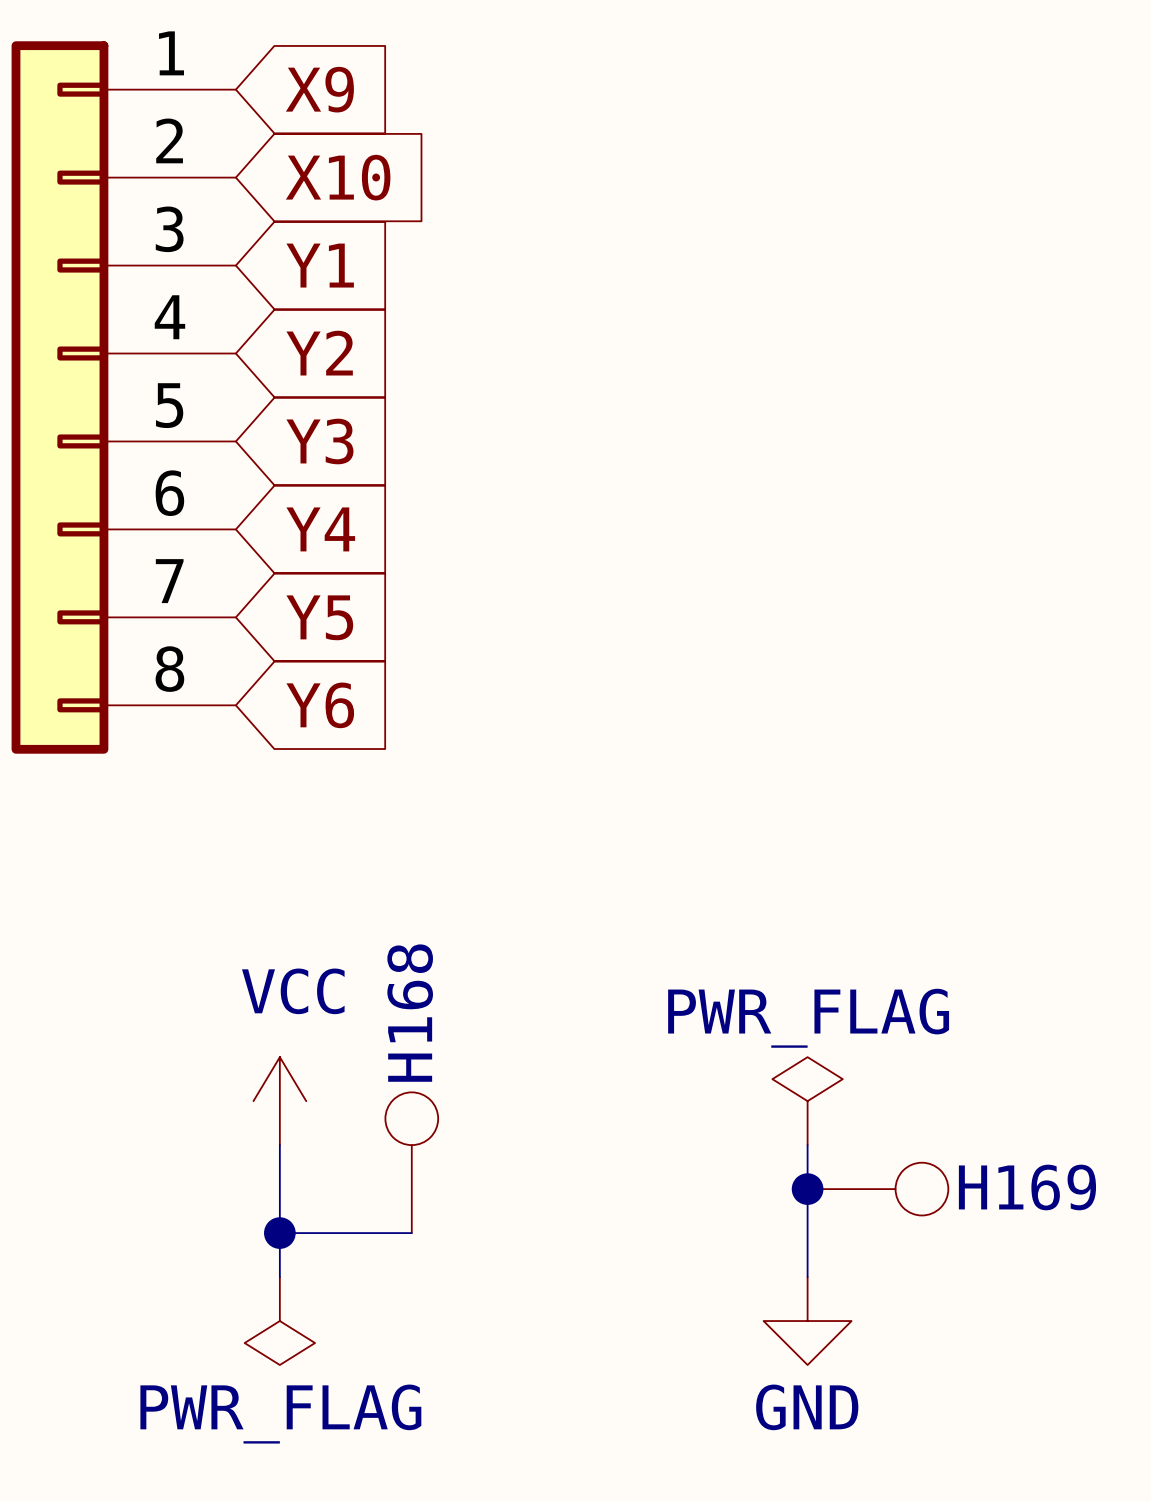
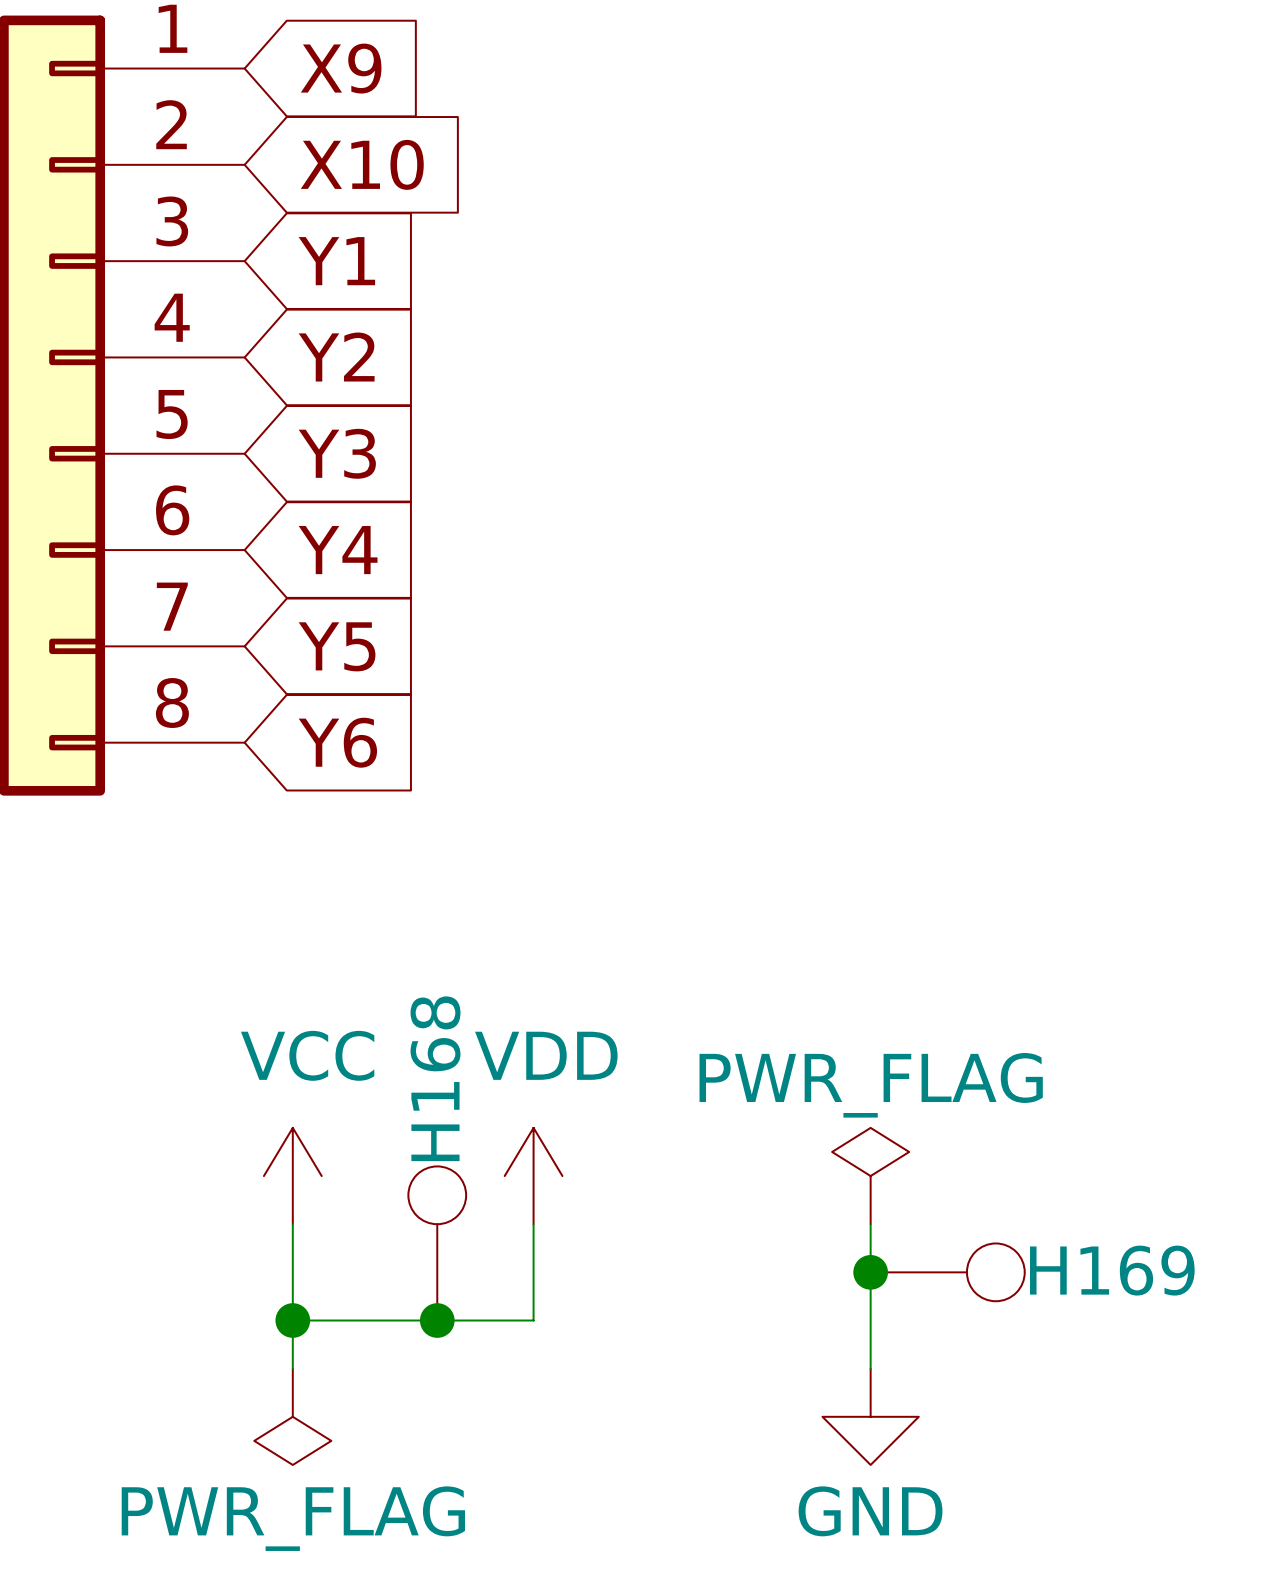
power symbol: none -> VDD (533, 1176)
wire: none -> (533, 1224) (533, 1320) (437, 1320)
junction: none -> (437, 1320)

